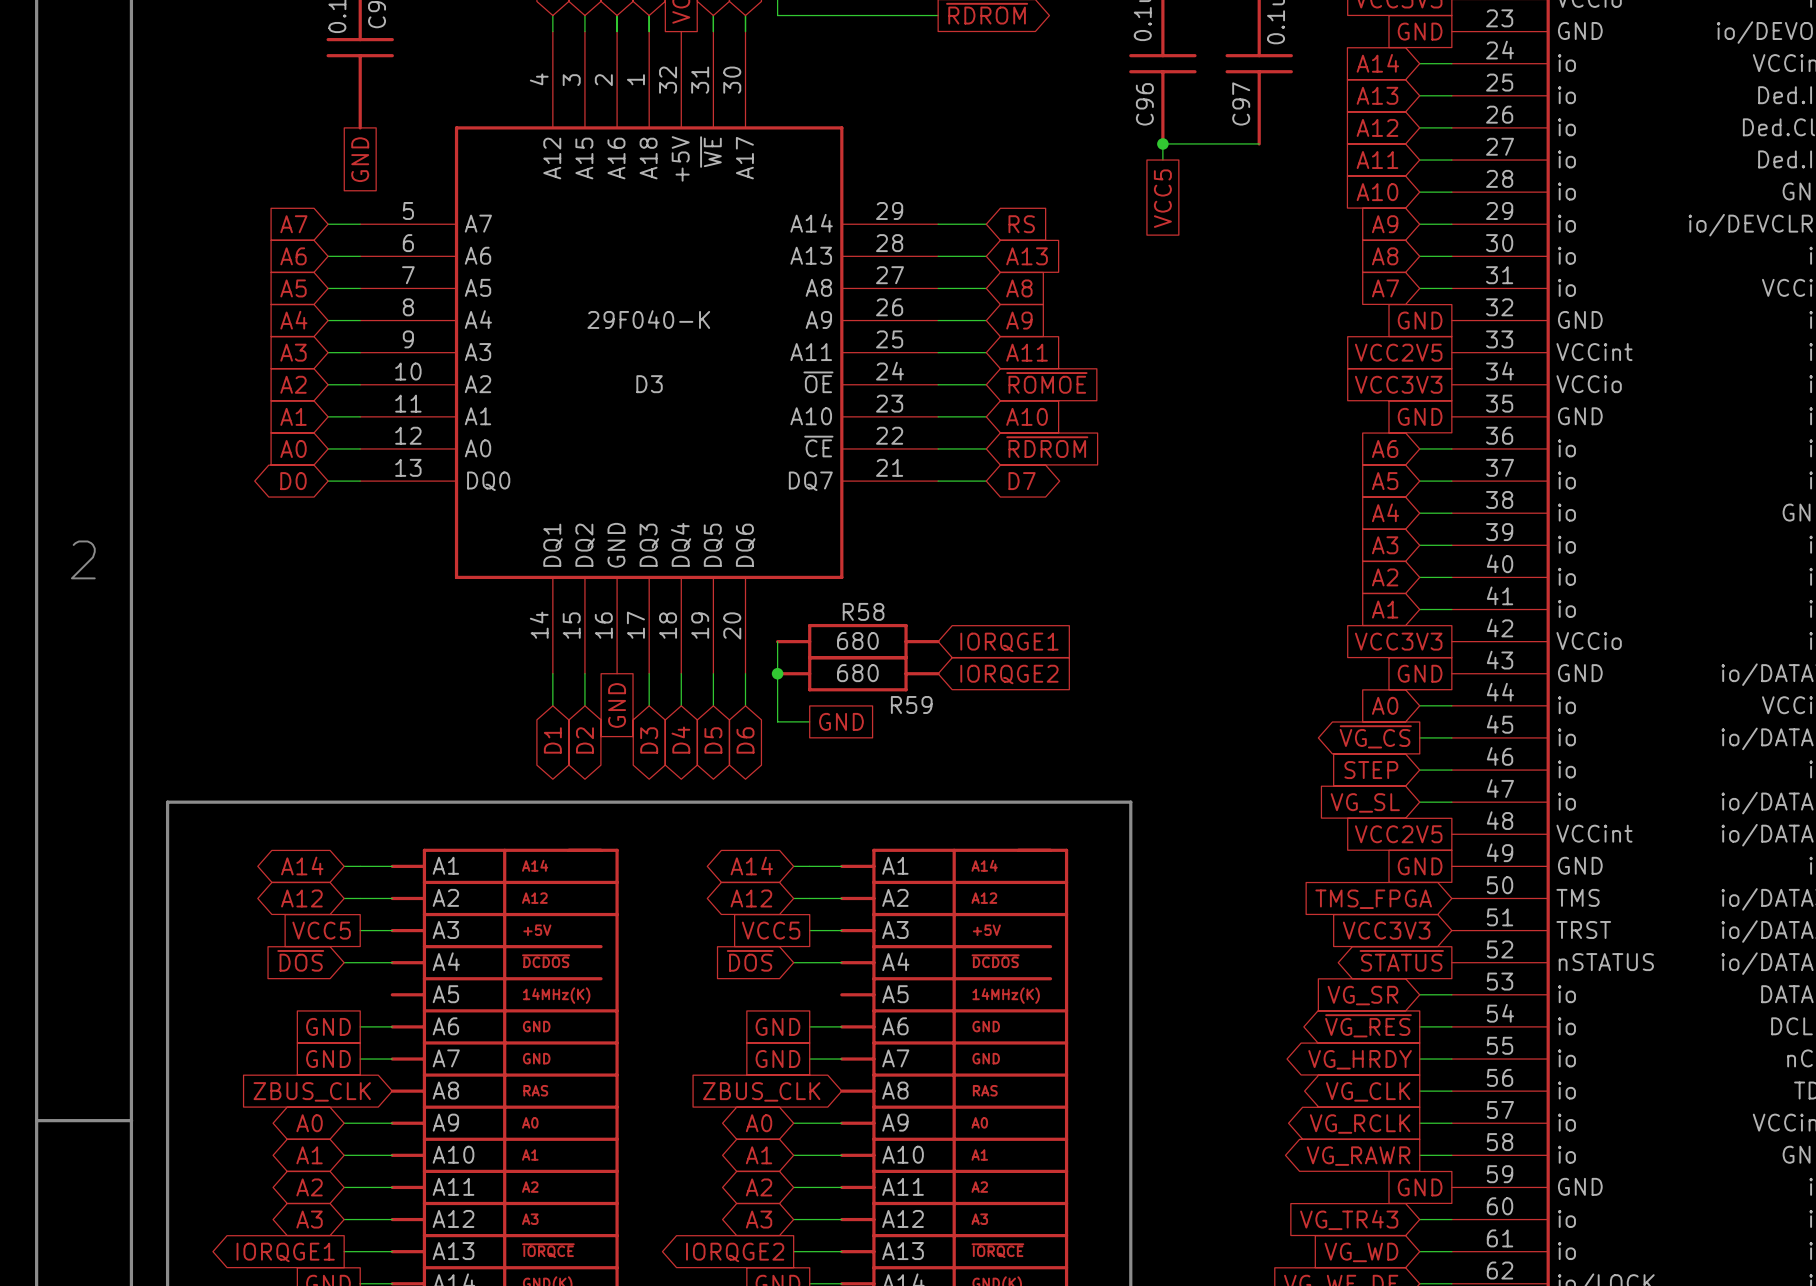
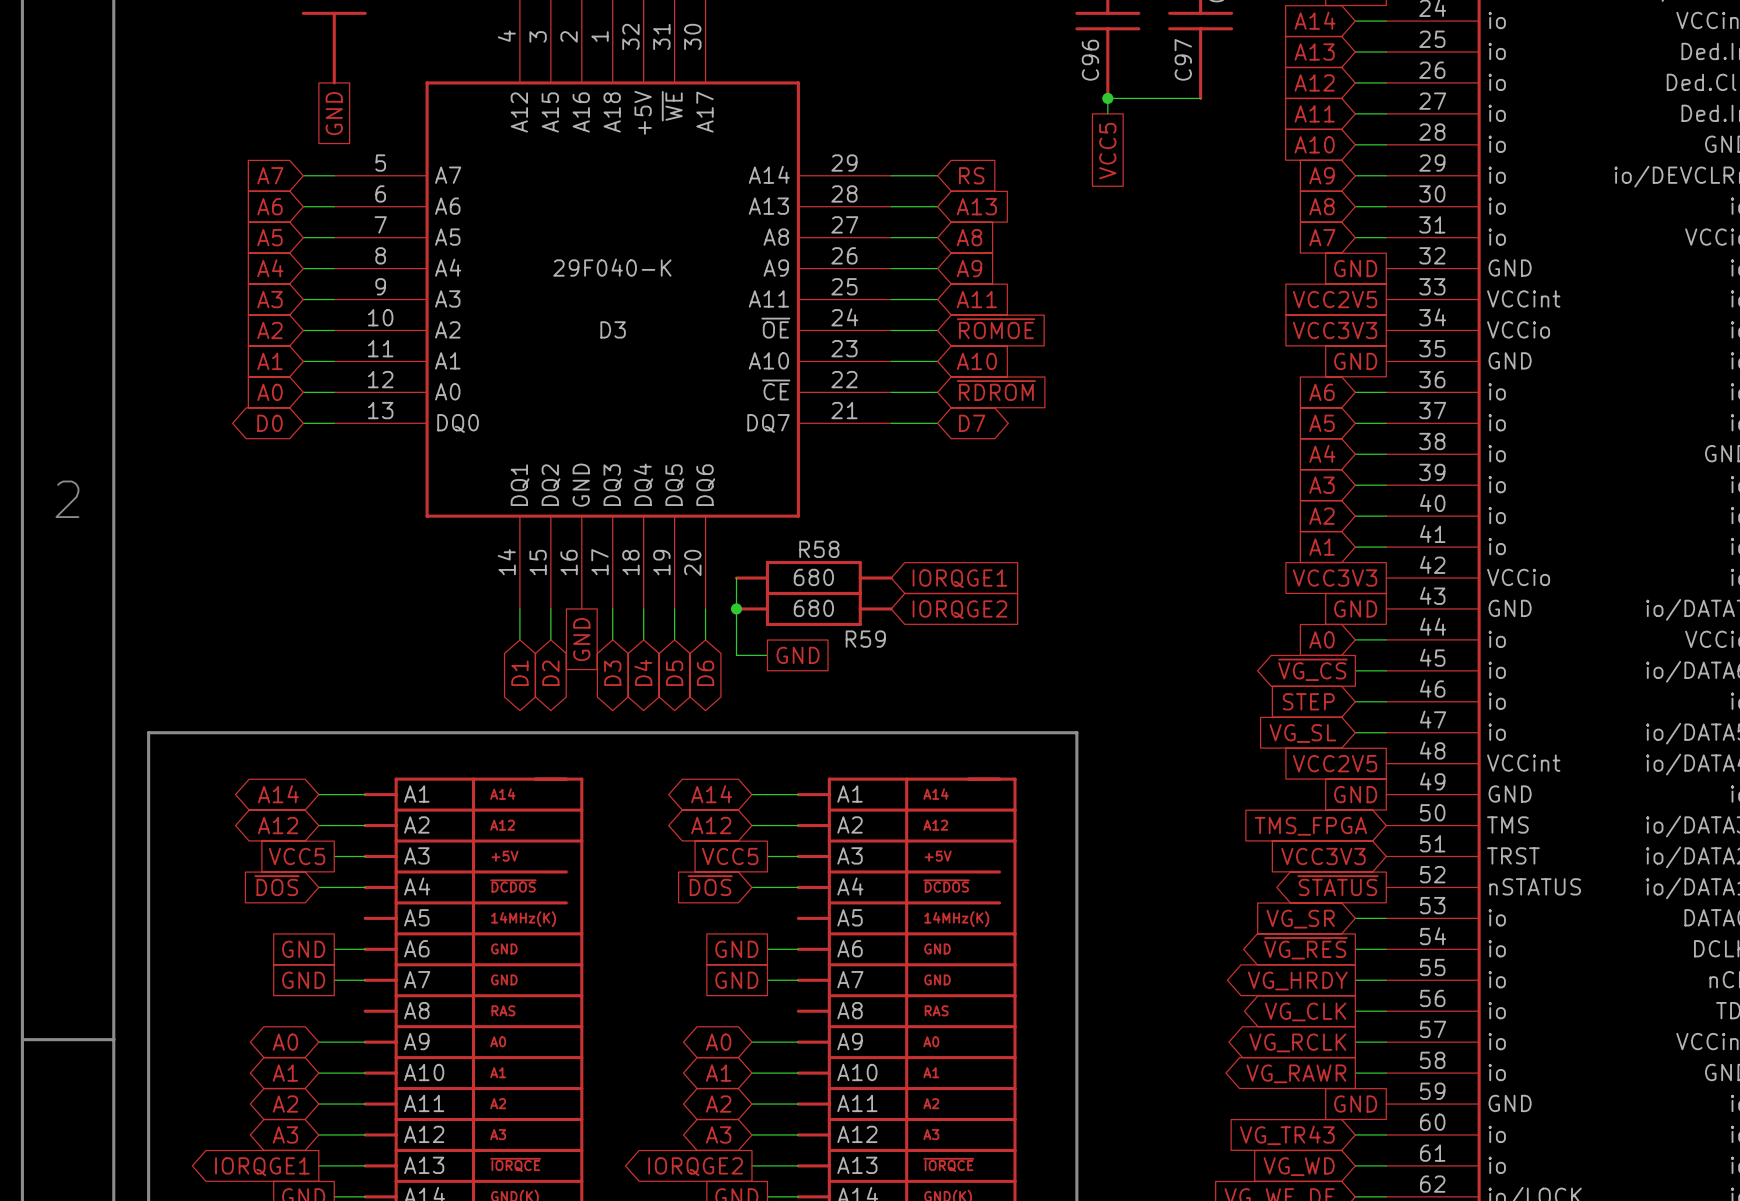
global label: ZBUS_CLK (312, 1091) -> none
global label: ZBUS_CLK (761, 1091) -> none

